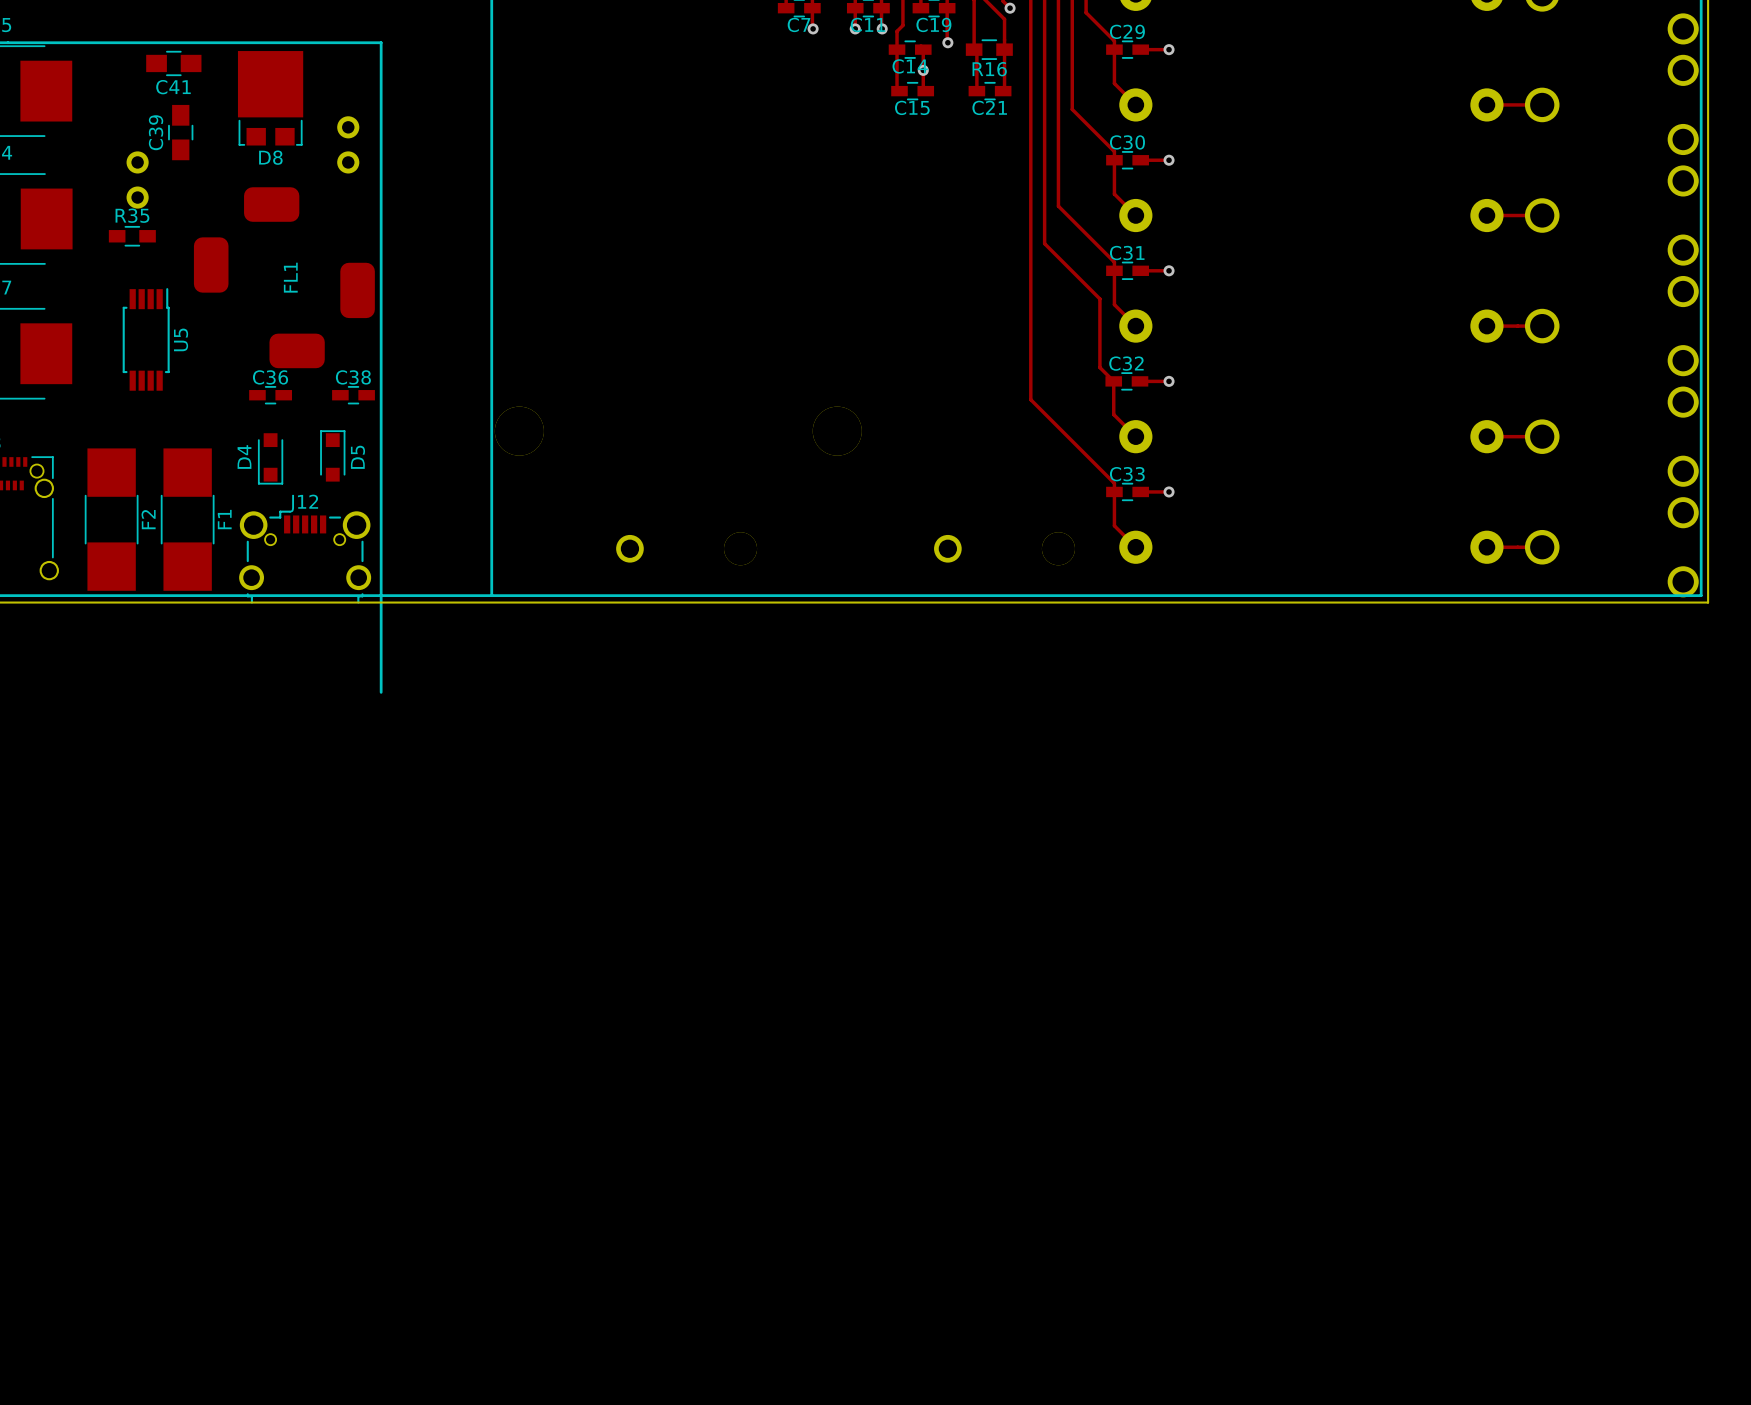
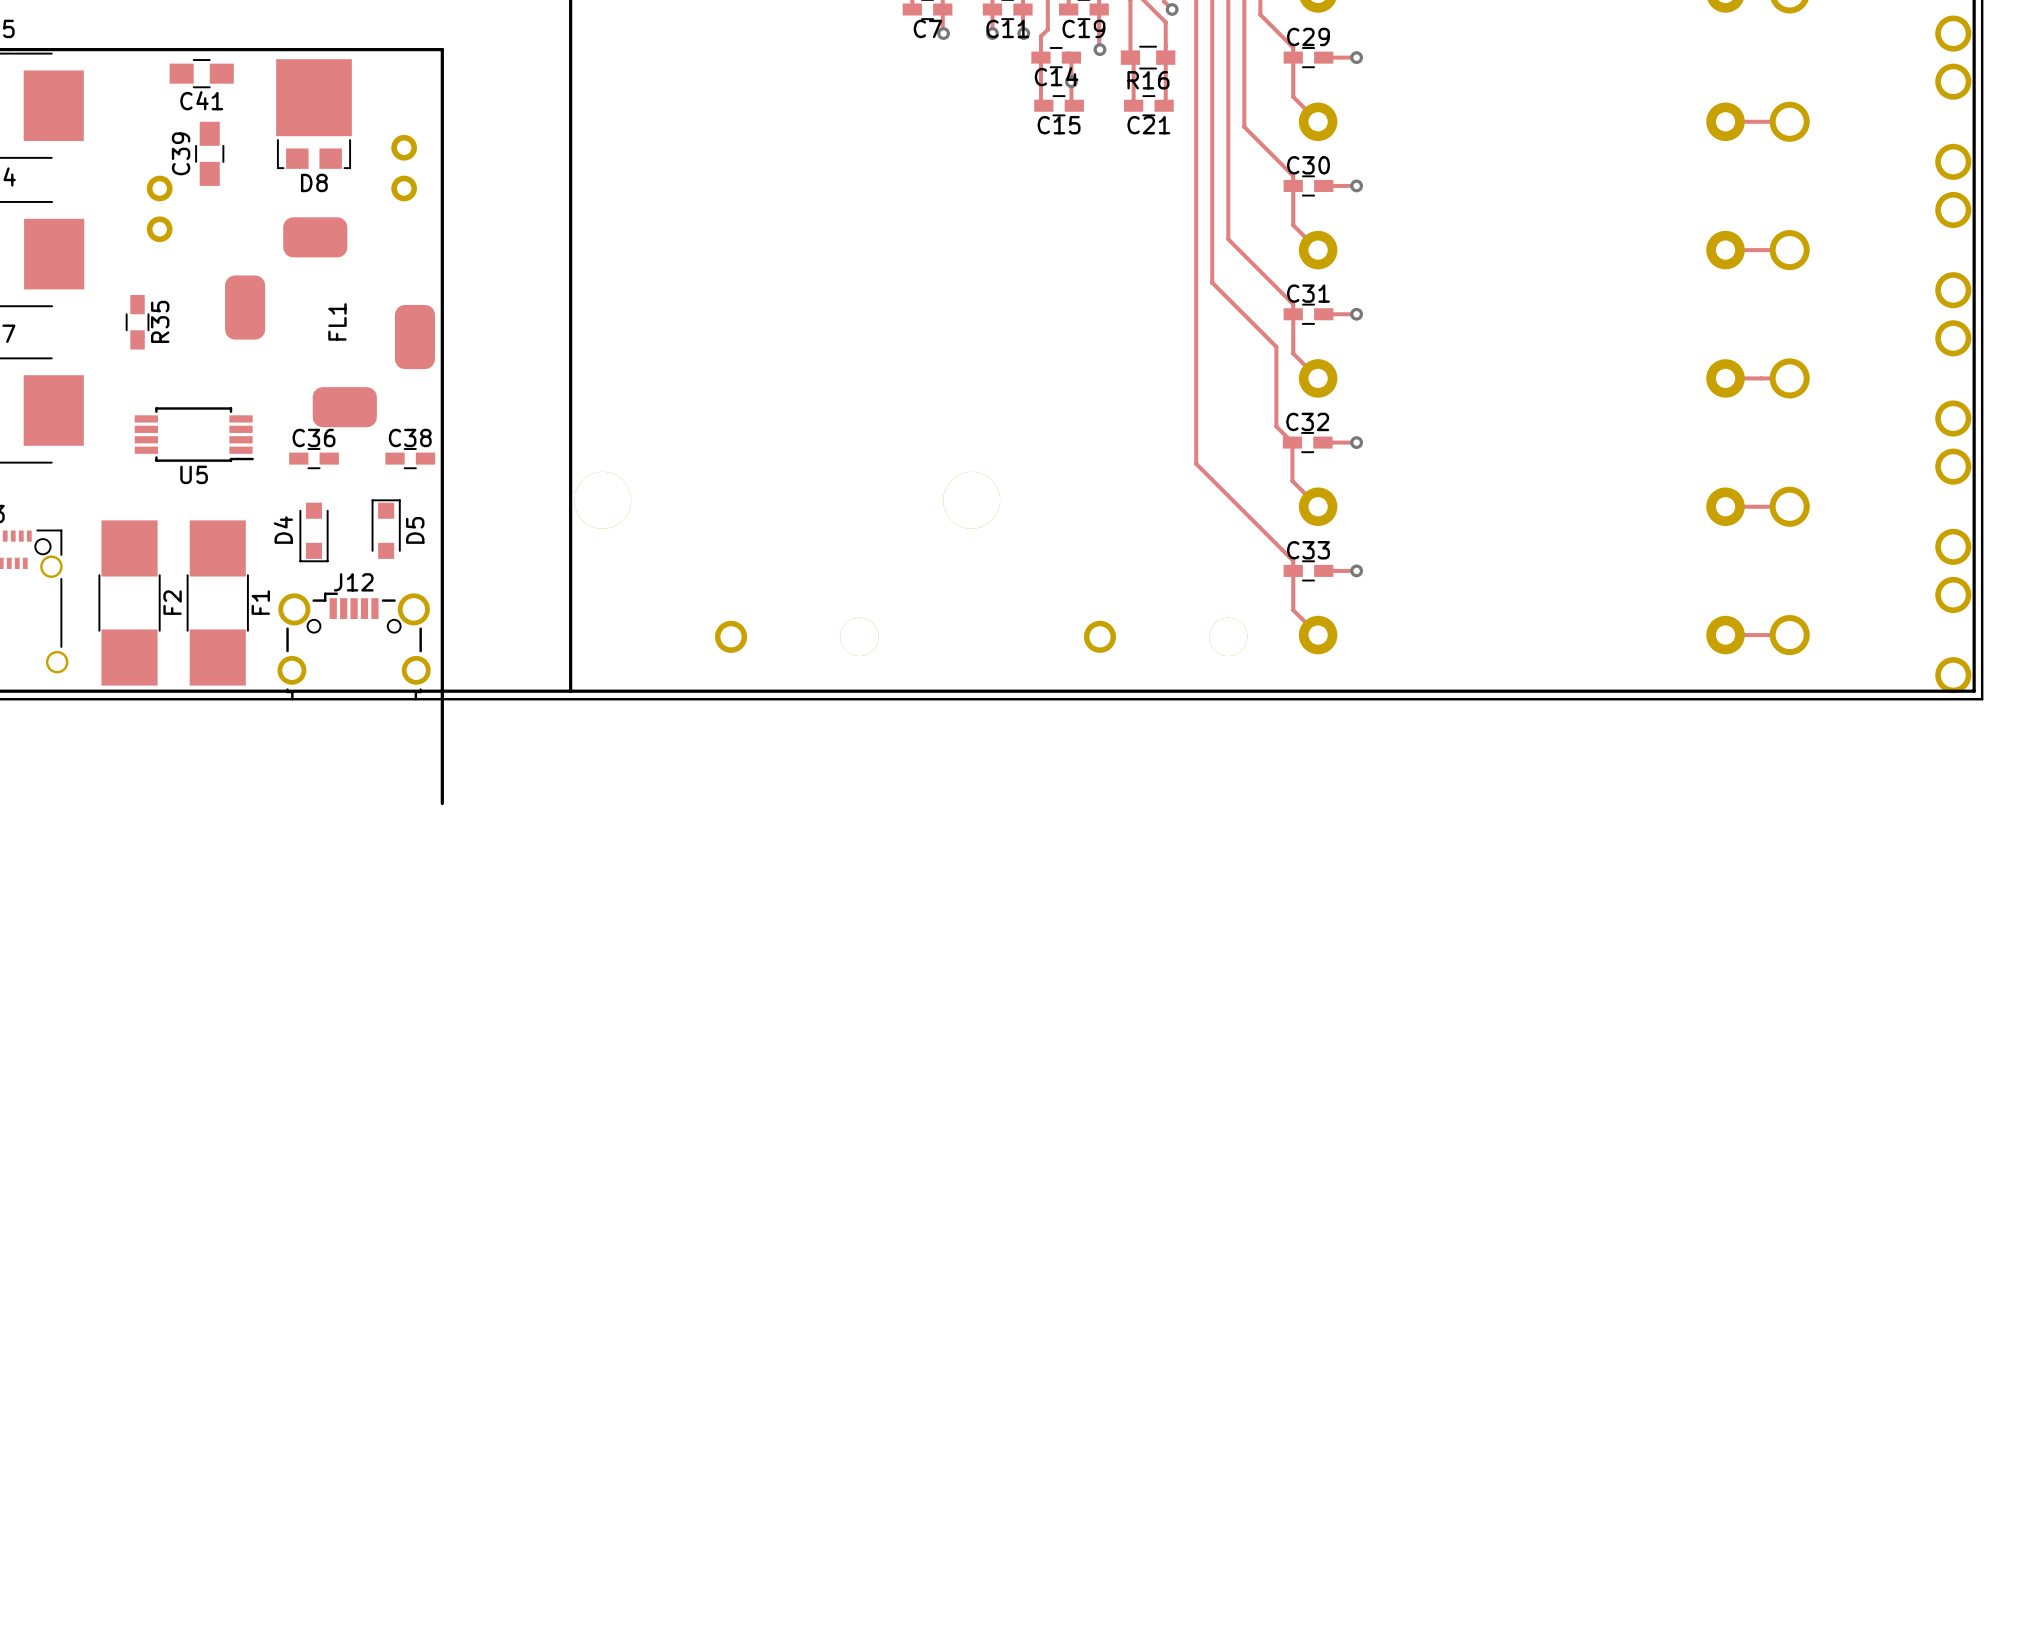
R35 rotation: 0° (132, 236) -> 90° clockwise (137, 322)
R35 position: (132, 236) -> (137, 322)
U5 rotation: 0° (146, 339) -> 90° clockwise (194, 434)

